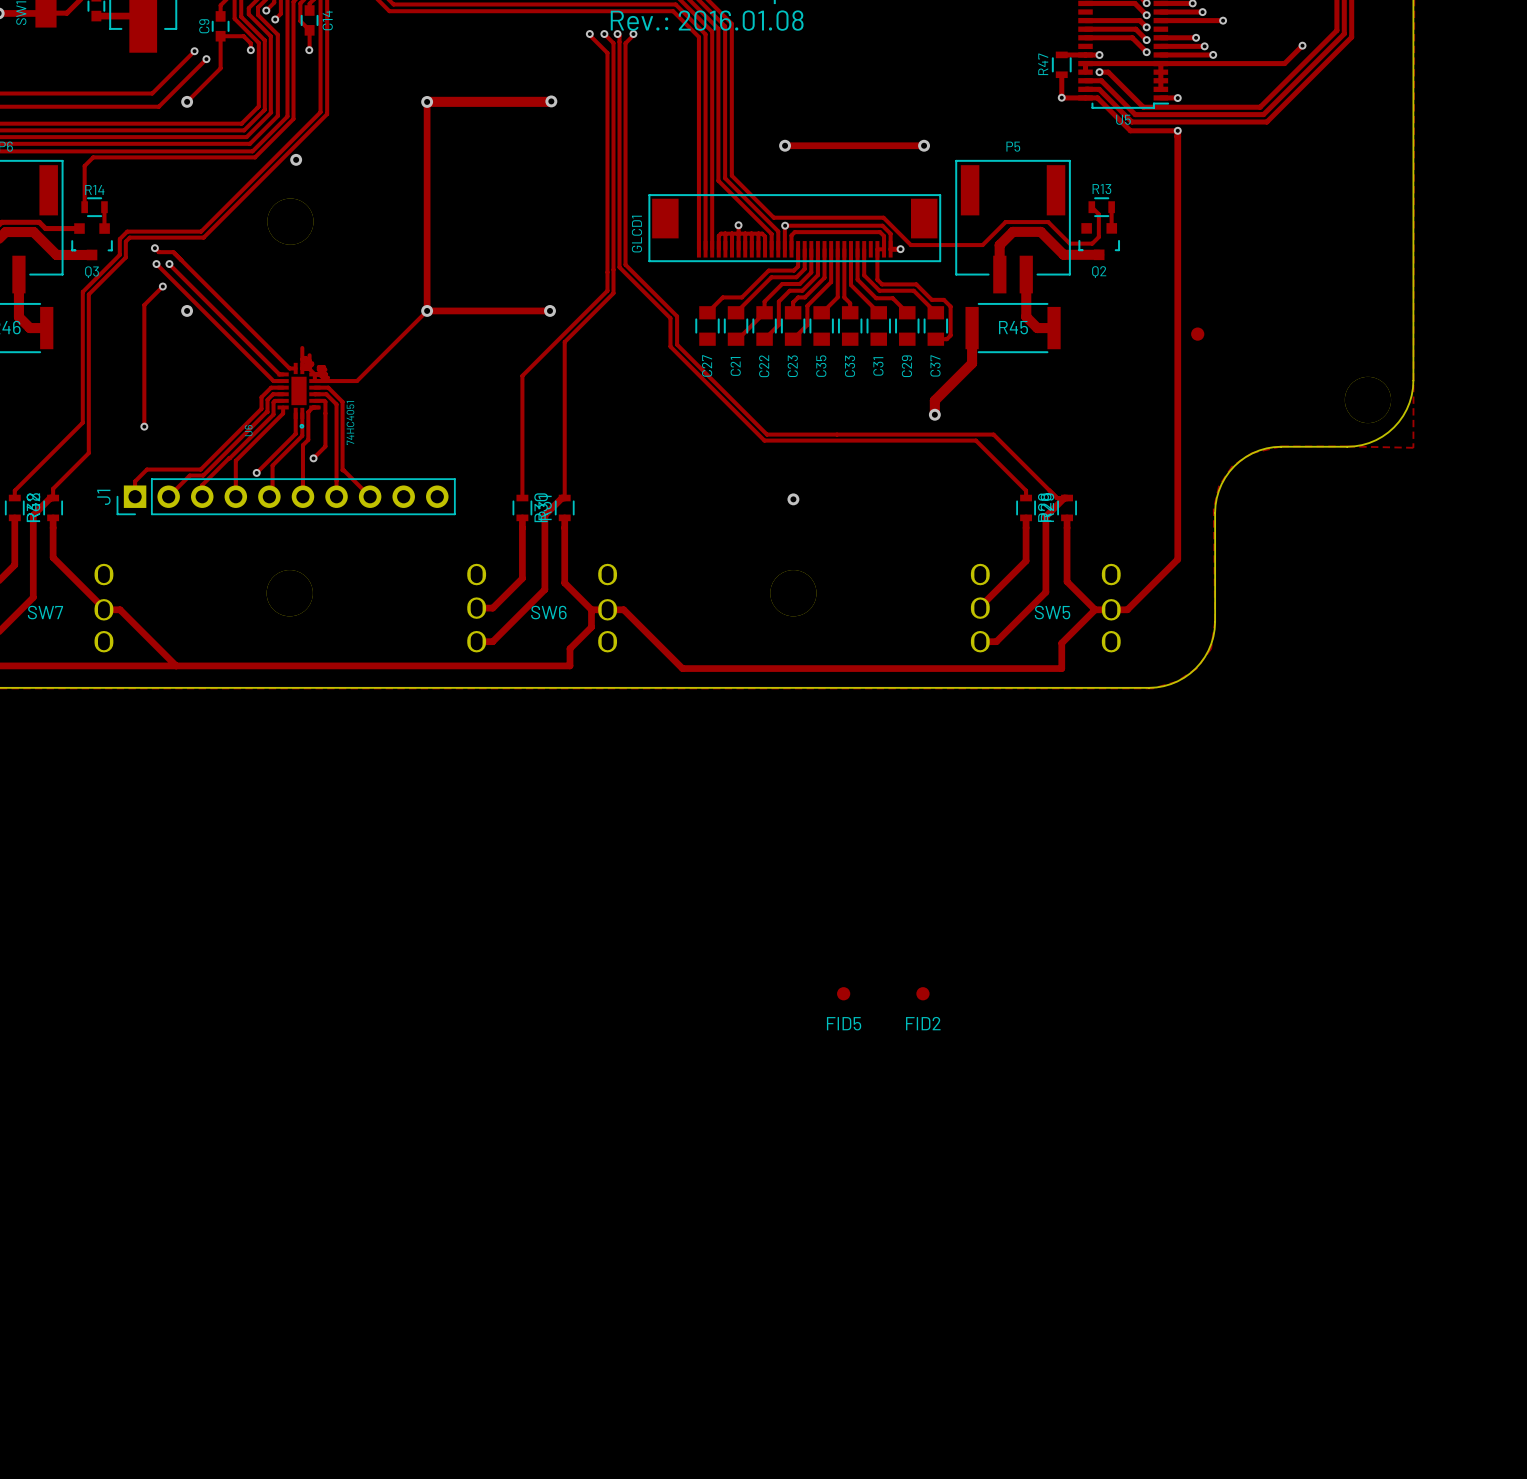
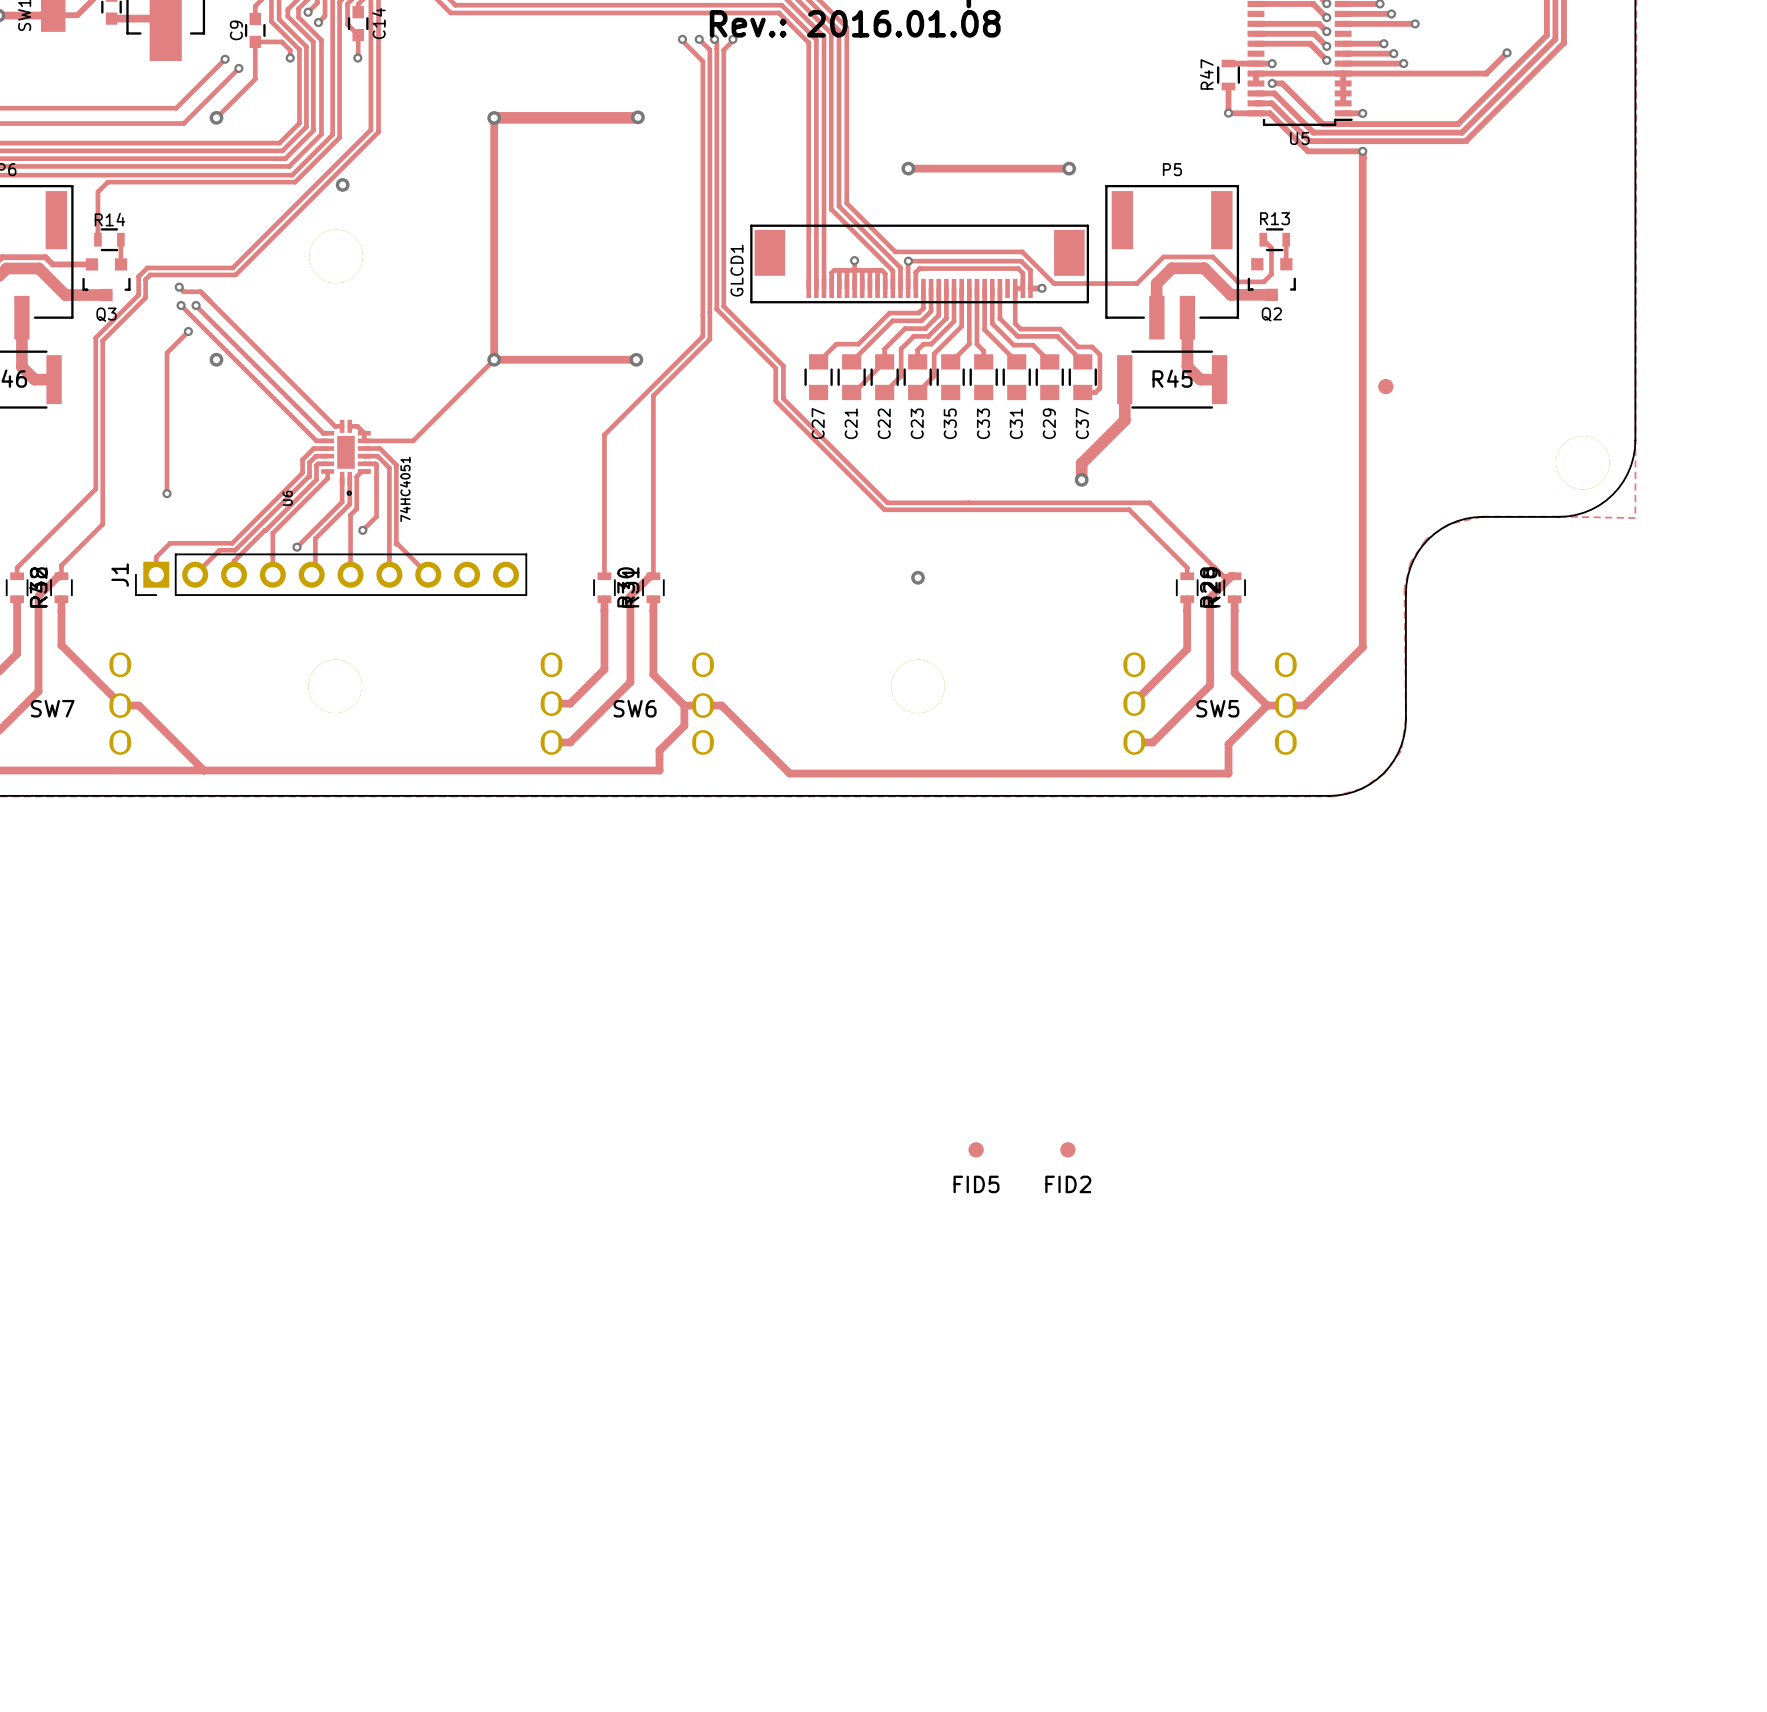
track: (302, 347) (302, 368) -> none
track: (309, 355) (309, 367) -> none
track: (305, 361) (305, 357) (306, 364) (302, 368) -> none
track: (312, 363) (308, 368) -> none
track: (325, 369) (324, 367) (318, 367) (318, 369) (326, 374) (314, 374) -> none
track: (319, 374) (322, 377) (328, 377) -> none

